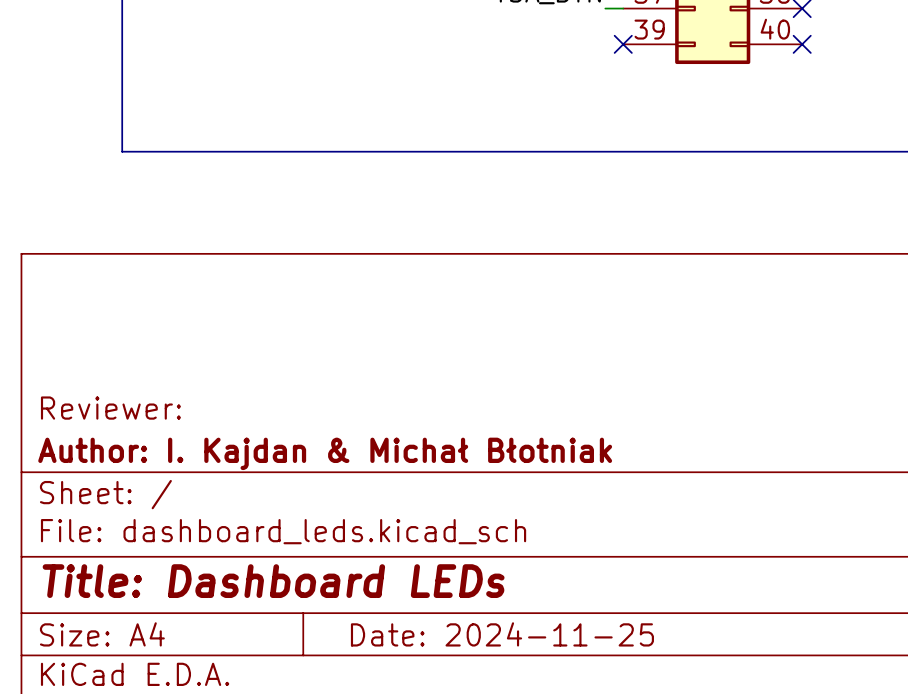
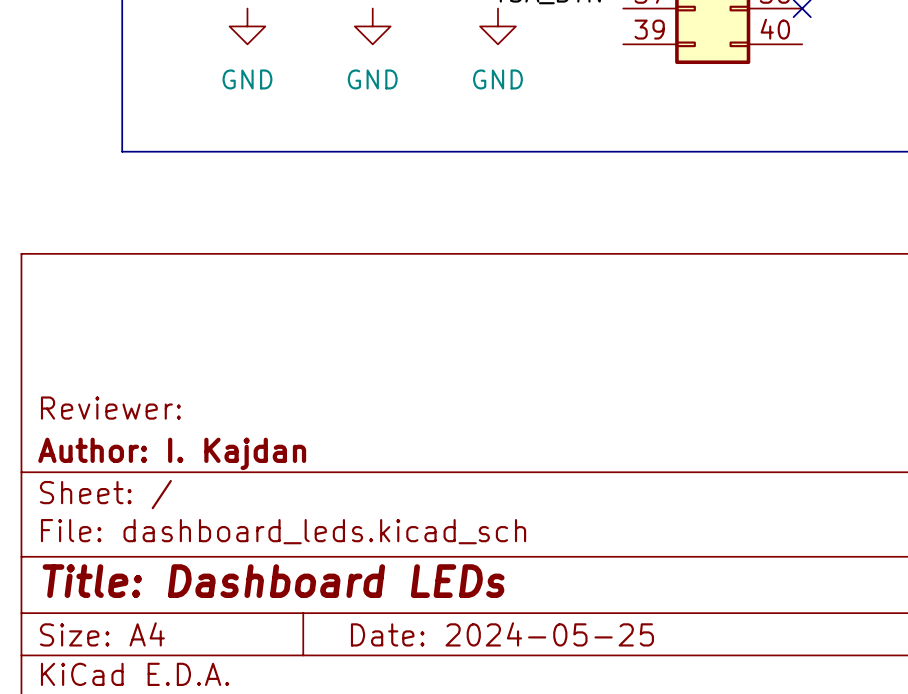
wire: (605, 8) (623, 8) -> none
power symbol: none -> GND (247, 26)
power symbol: none -> GND (372, 26)
power symbol: none -> GND (497, 26)
no-connect mark: (623, 44) -> none
no-connect mark: (802, 44) -> none
title block: Author: I. Kajdan & Michał Błotniak (325, 453) -> Author: I. Kajdan (172, 453)
title block: Date: 2024-11-25 (502, 634) -> Date: 2024-05-25 (502, 634)

